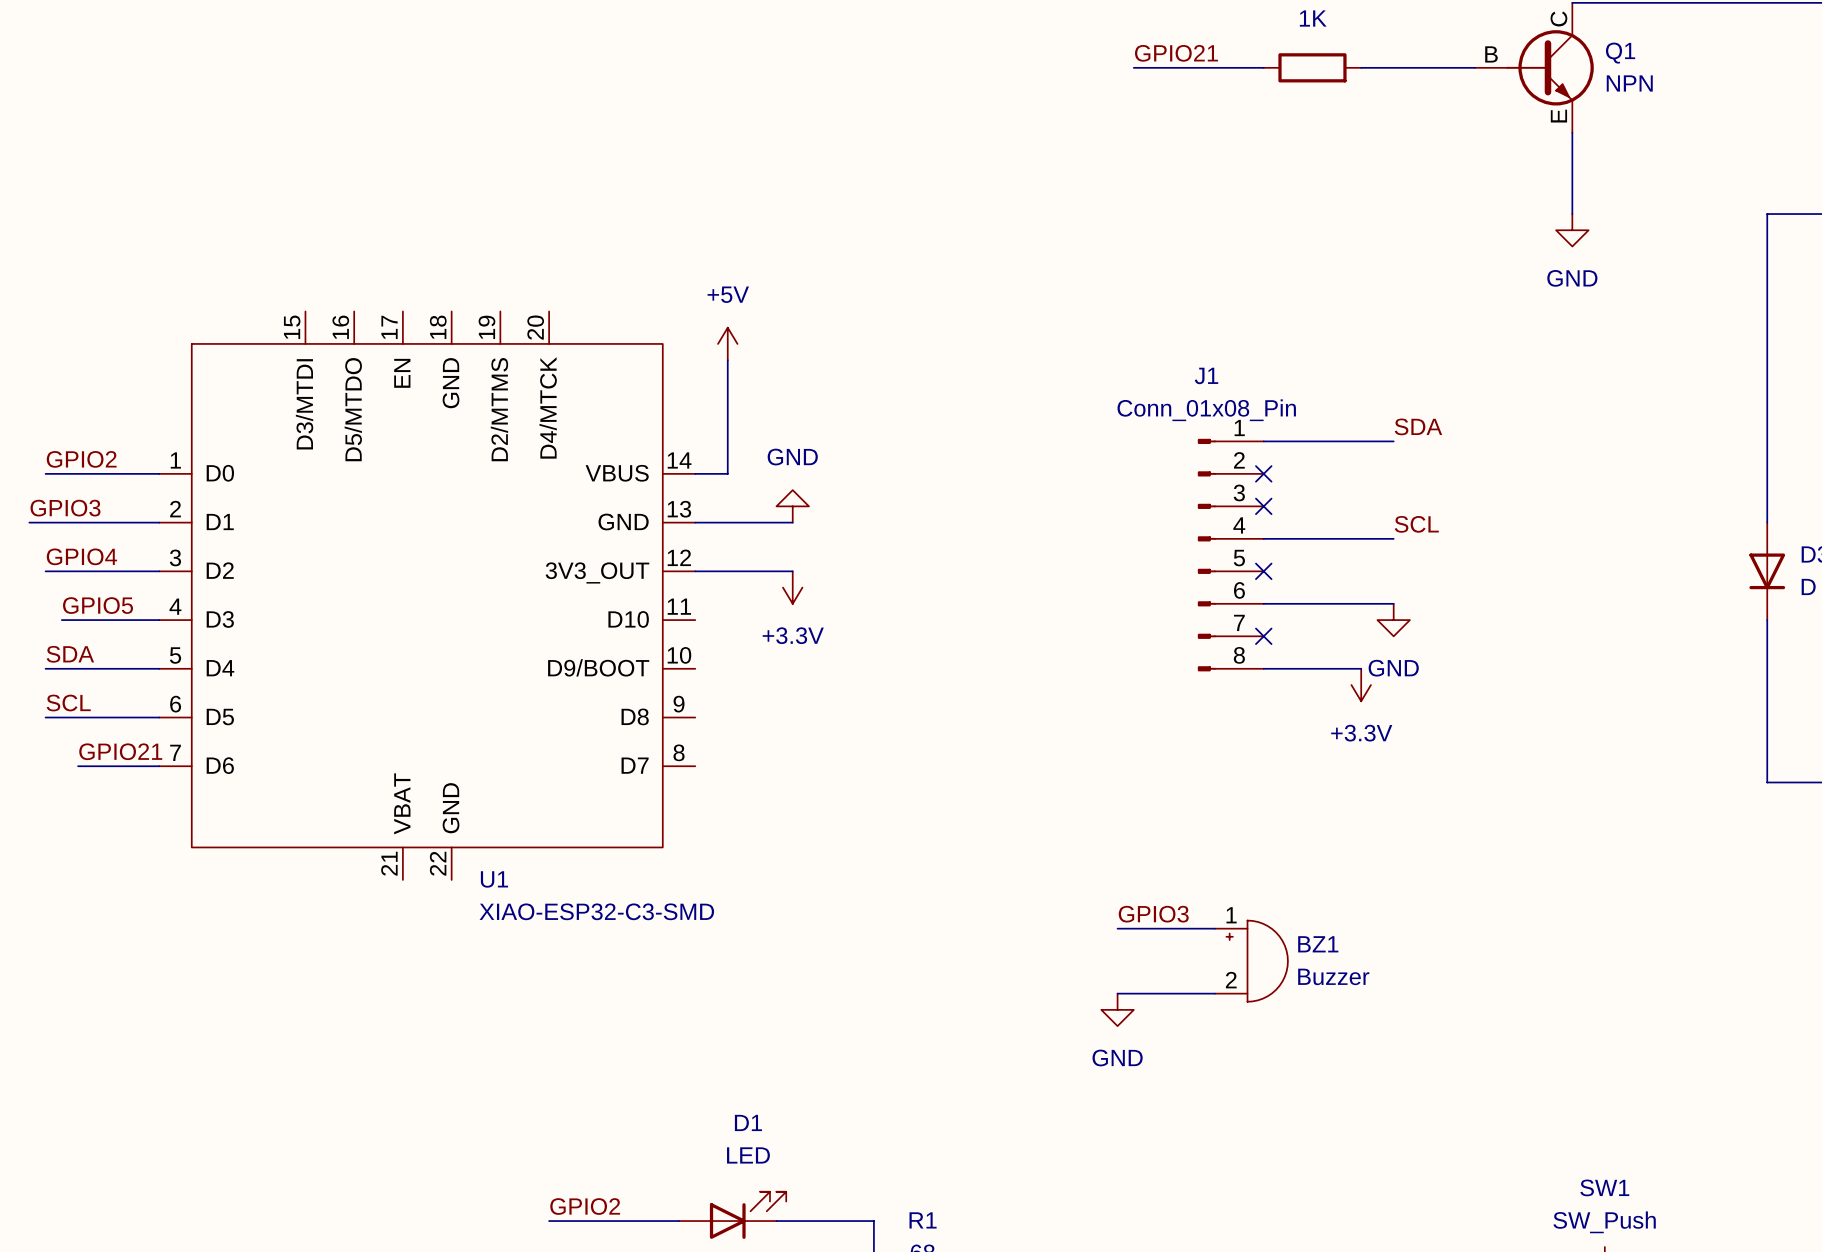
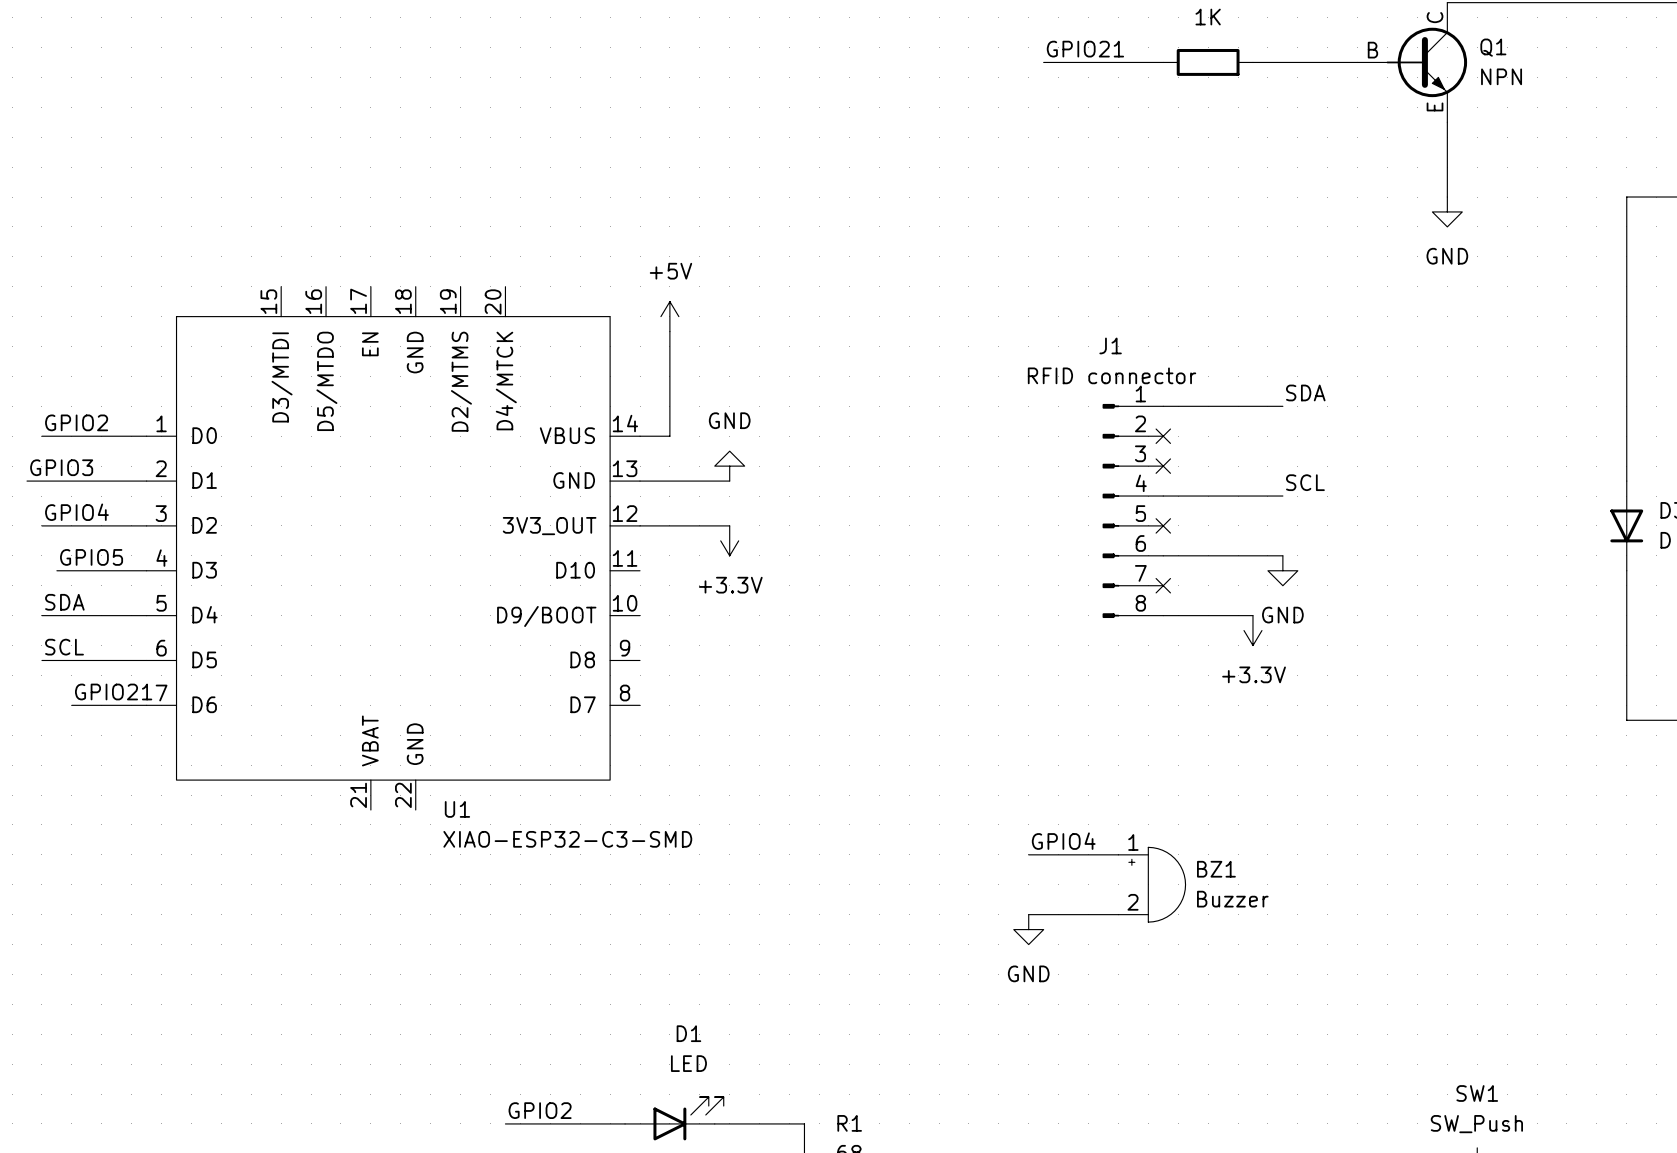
J1 value: Conn_01x08_Pin (1206, 410) -> RFID connector (1112, 375)
label: GPIO3 (1153, 914) -> GPIO4 (1063, 841)

